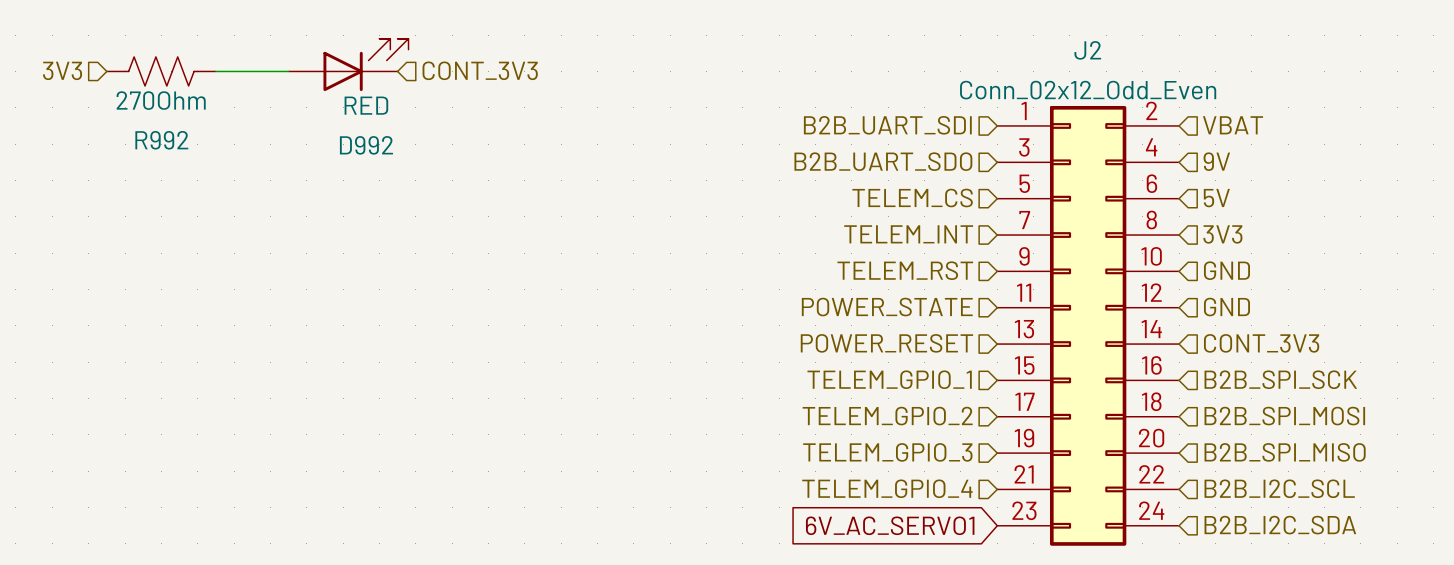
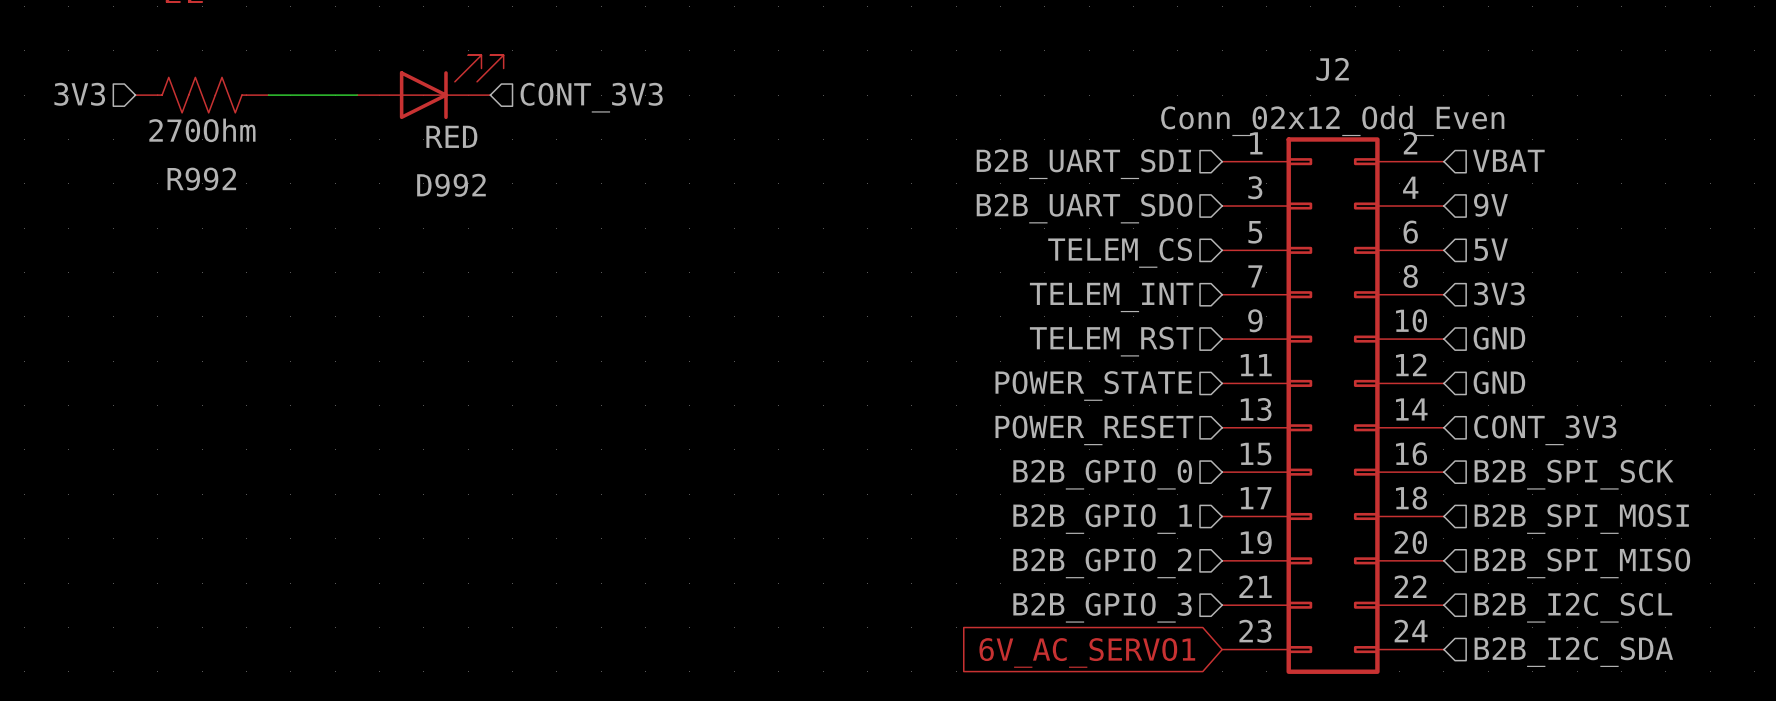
hierarchical label: TELEM_GPIO_1 (889, 379) -> B2B_GPIO_0 (1102, 474)
hierarchical label: TELEM_GPIO_2 (887, 416) -> B2B_GPIO_1 (1102, 519)
hierarchical label: TELEM_GPIO_3 (887, 452) -> B2B_GPIO_2 (1102, 563)
hierarchical label: TELEM_GPIO_4 (887, 488) -> B2B_GPIO_3 (1102, 607)

